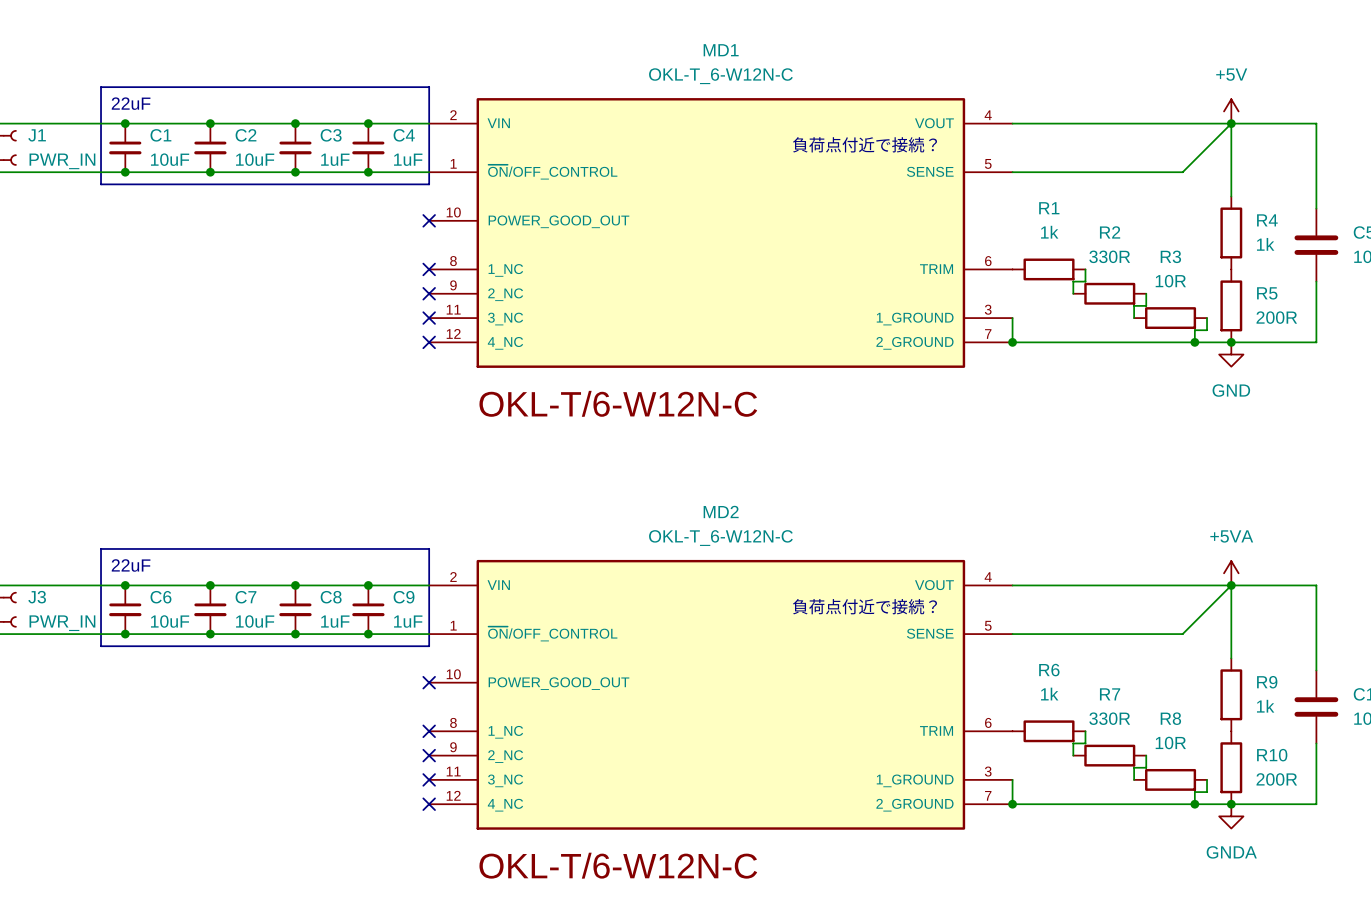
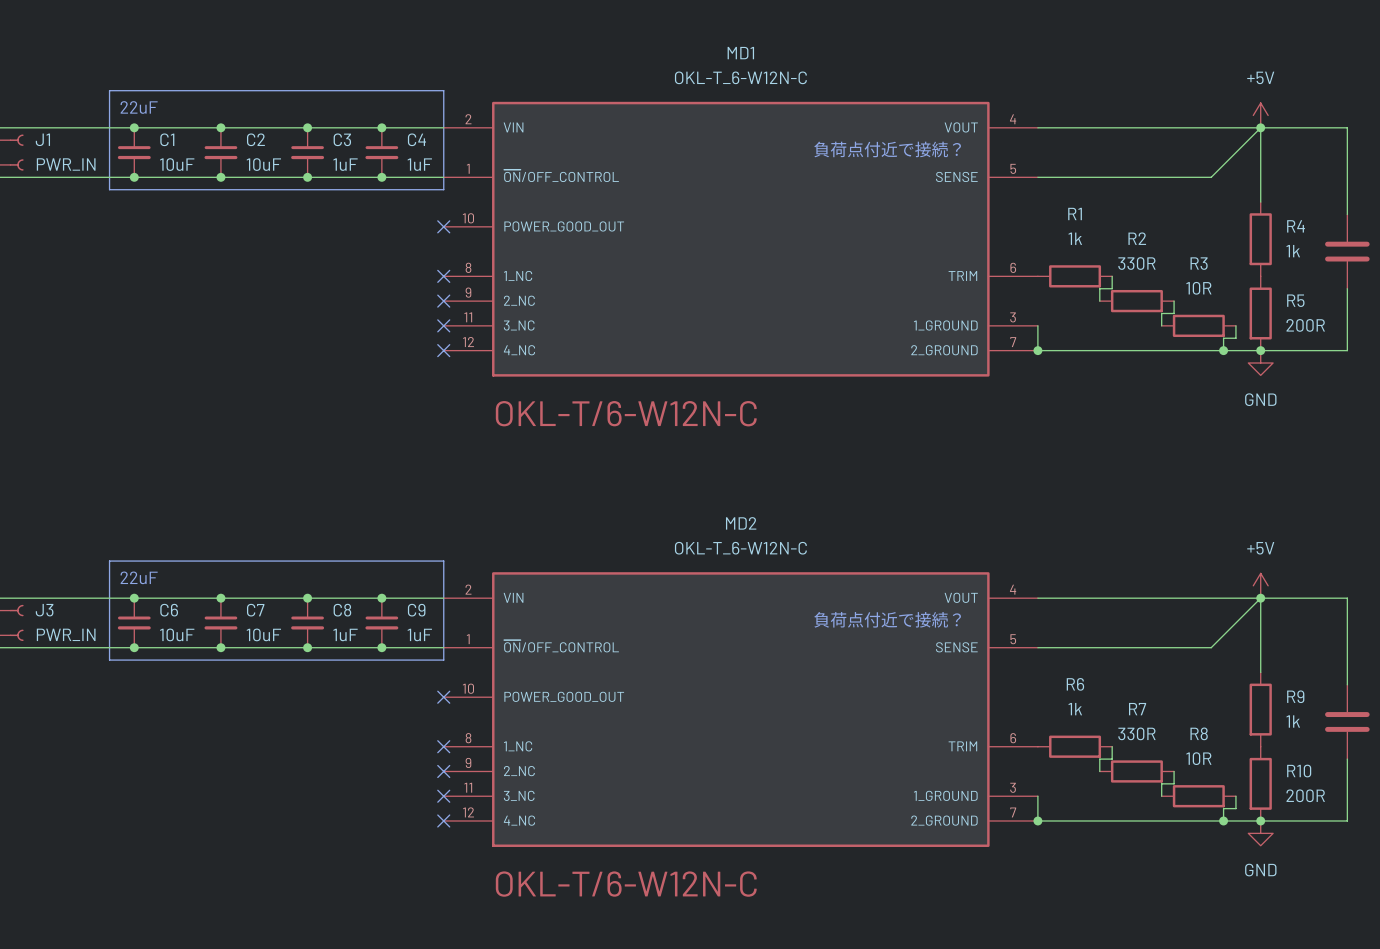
power symbol: +5VA (1231, 573) -> +5V (1260, 585)
power symbol: GNDA (1231, 816) -> GND (1260, 833)

